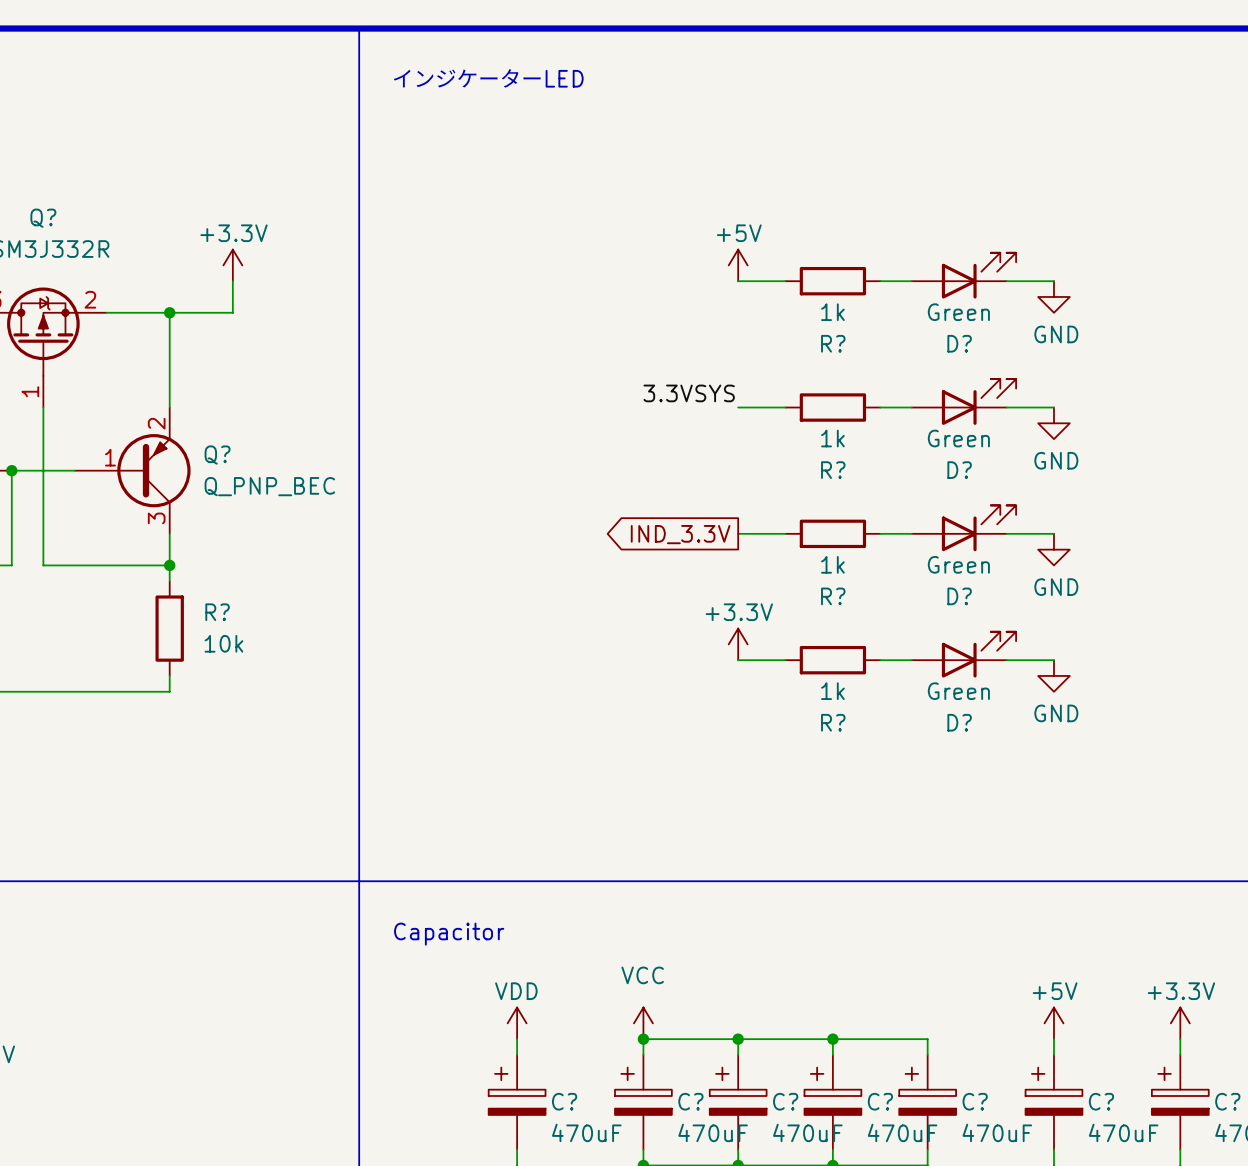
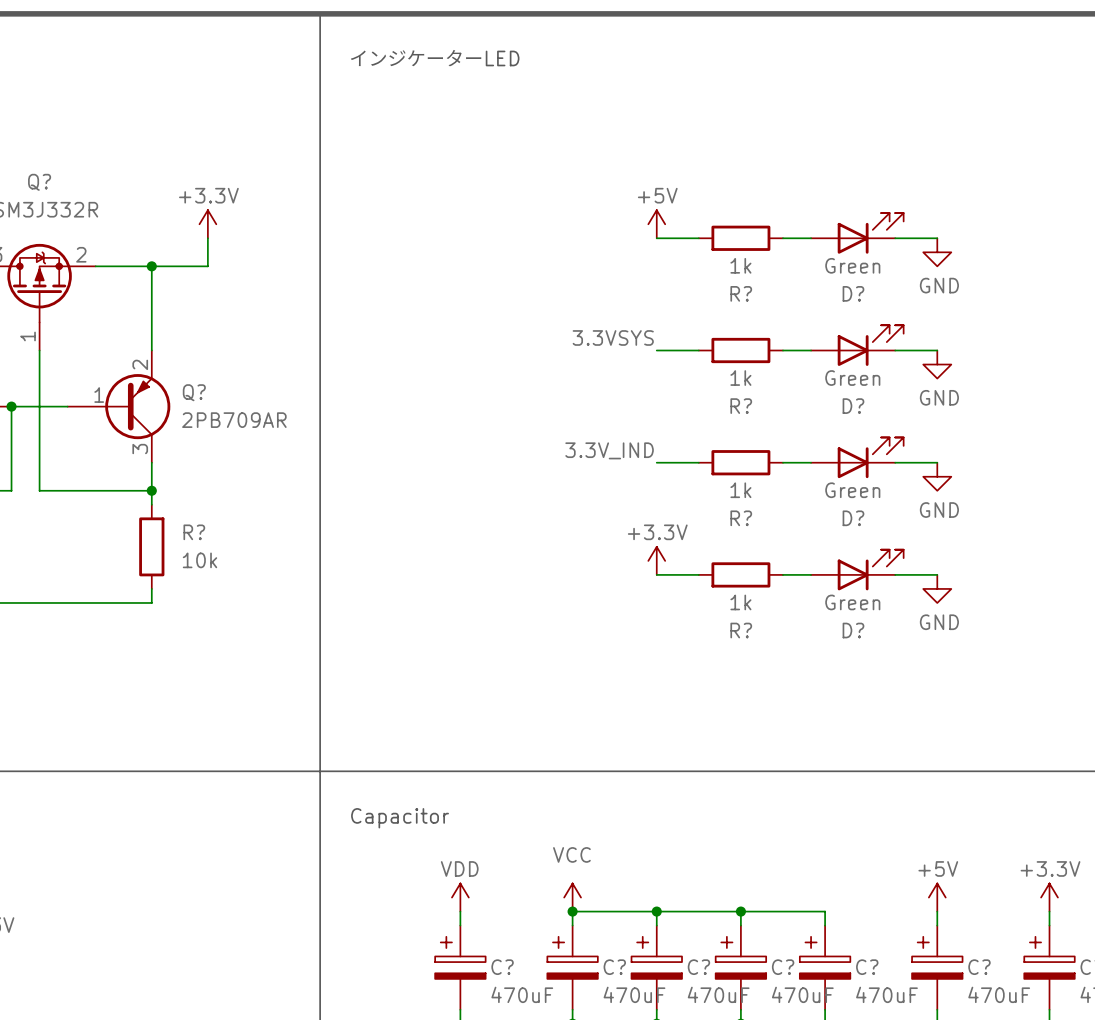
Q? value: Q_PNP_BEC (269, 486) -> 2PB709AR (234, 420)
label: none -> 3.3V_IND (609, 450)
global label: IND_3.3V (680, 534) -> none

